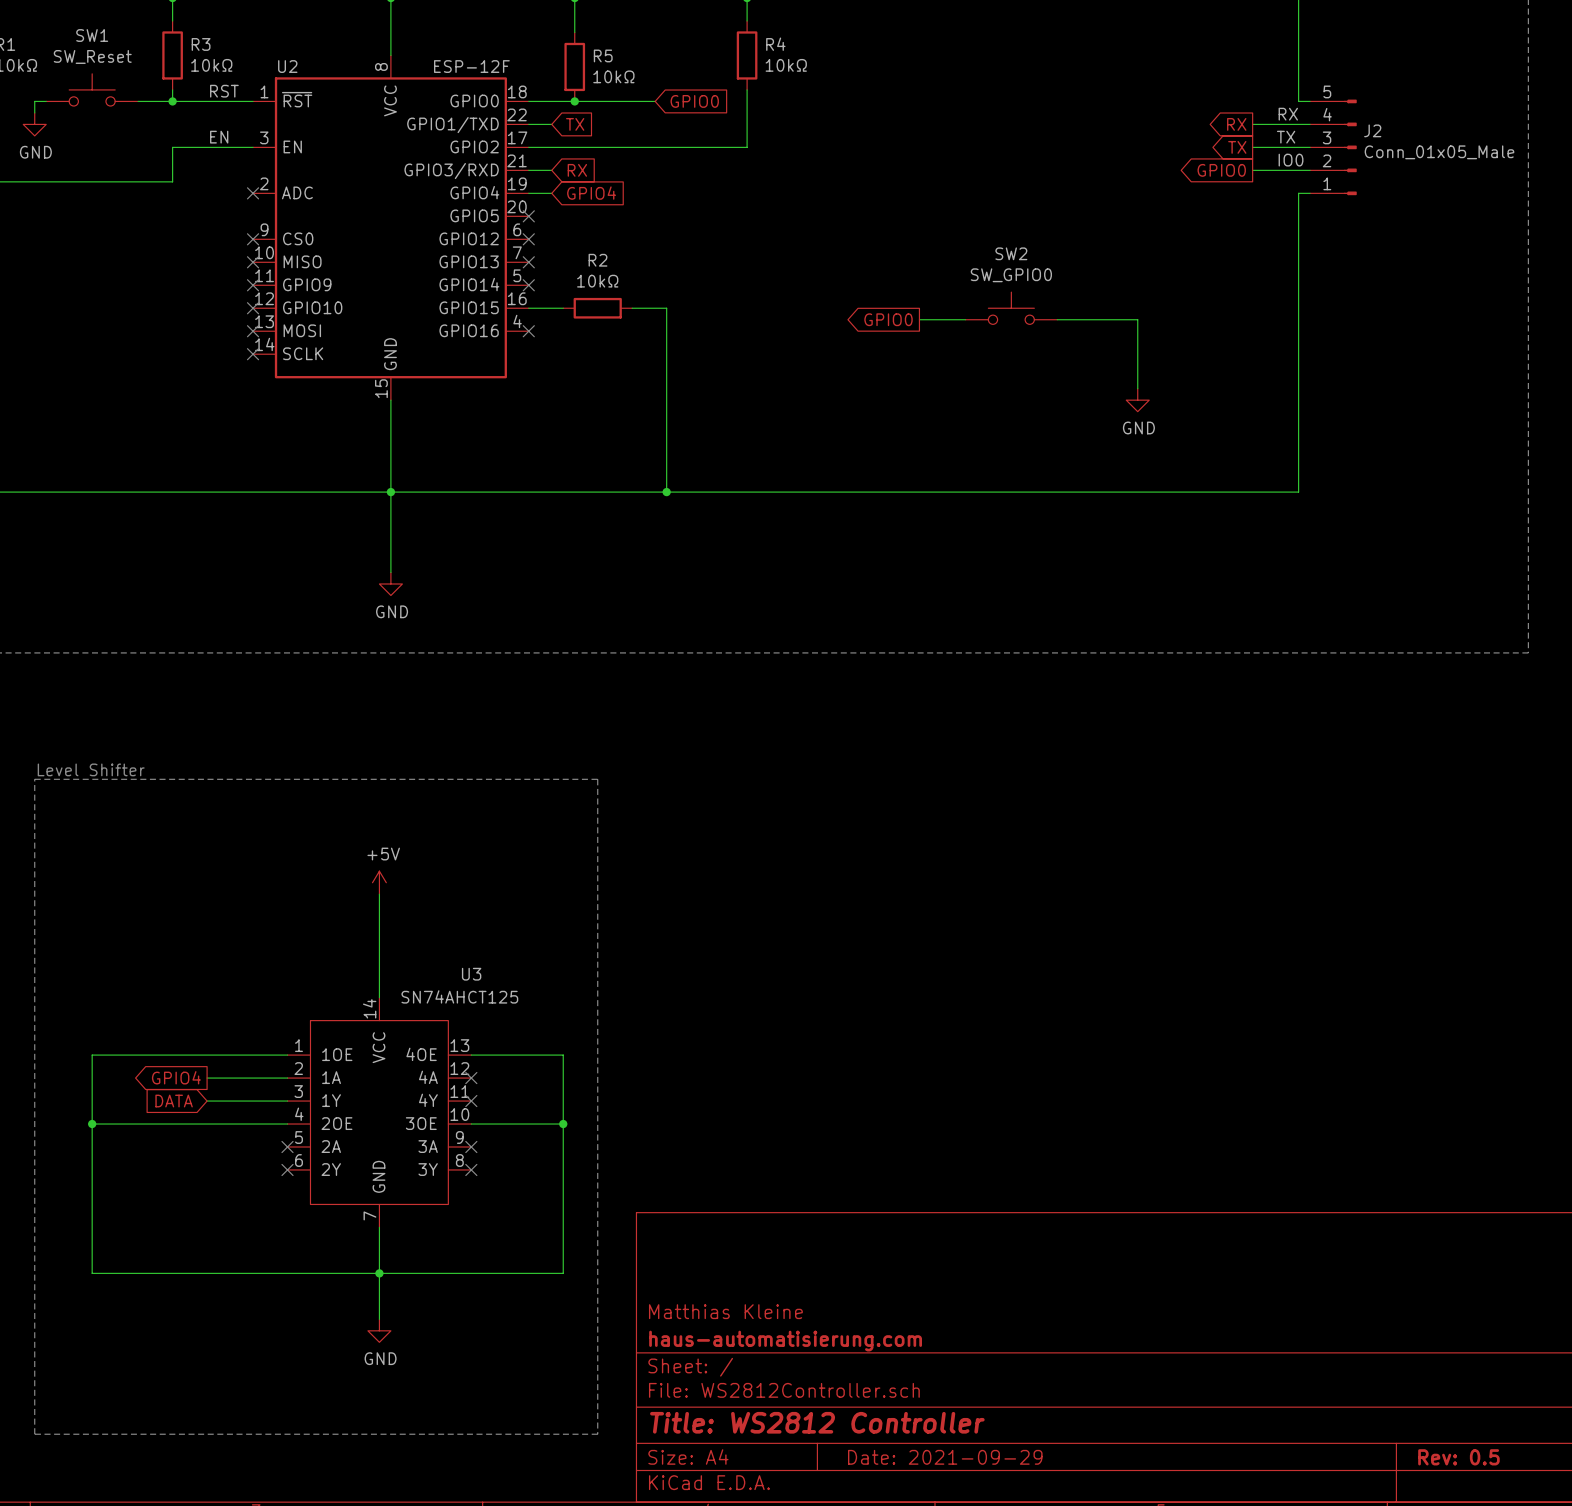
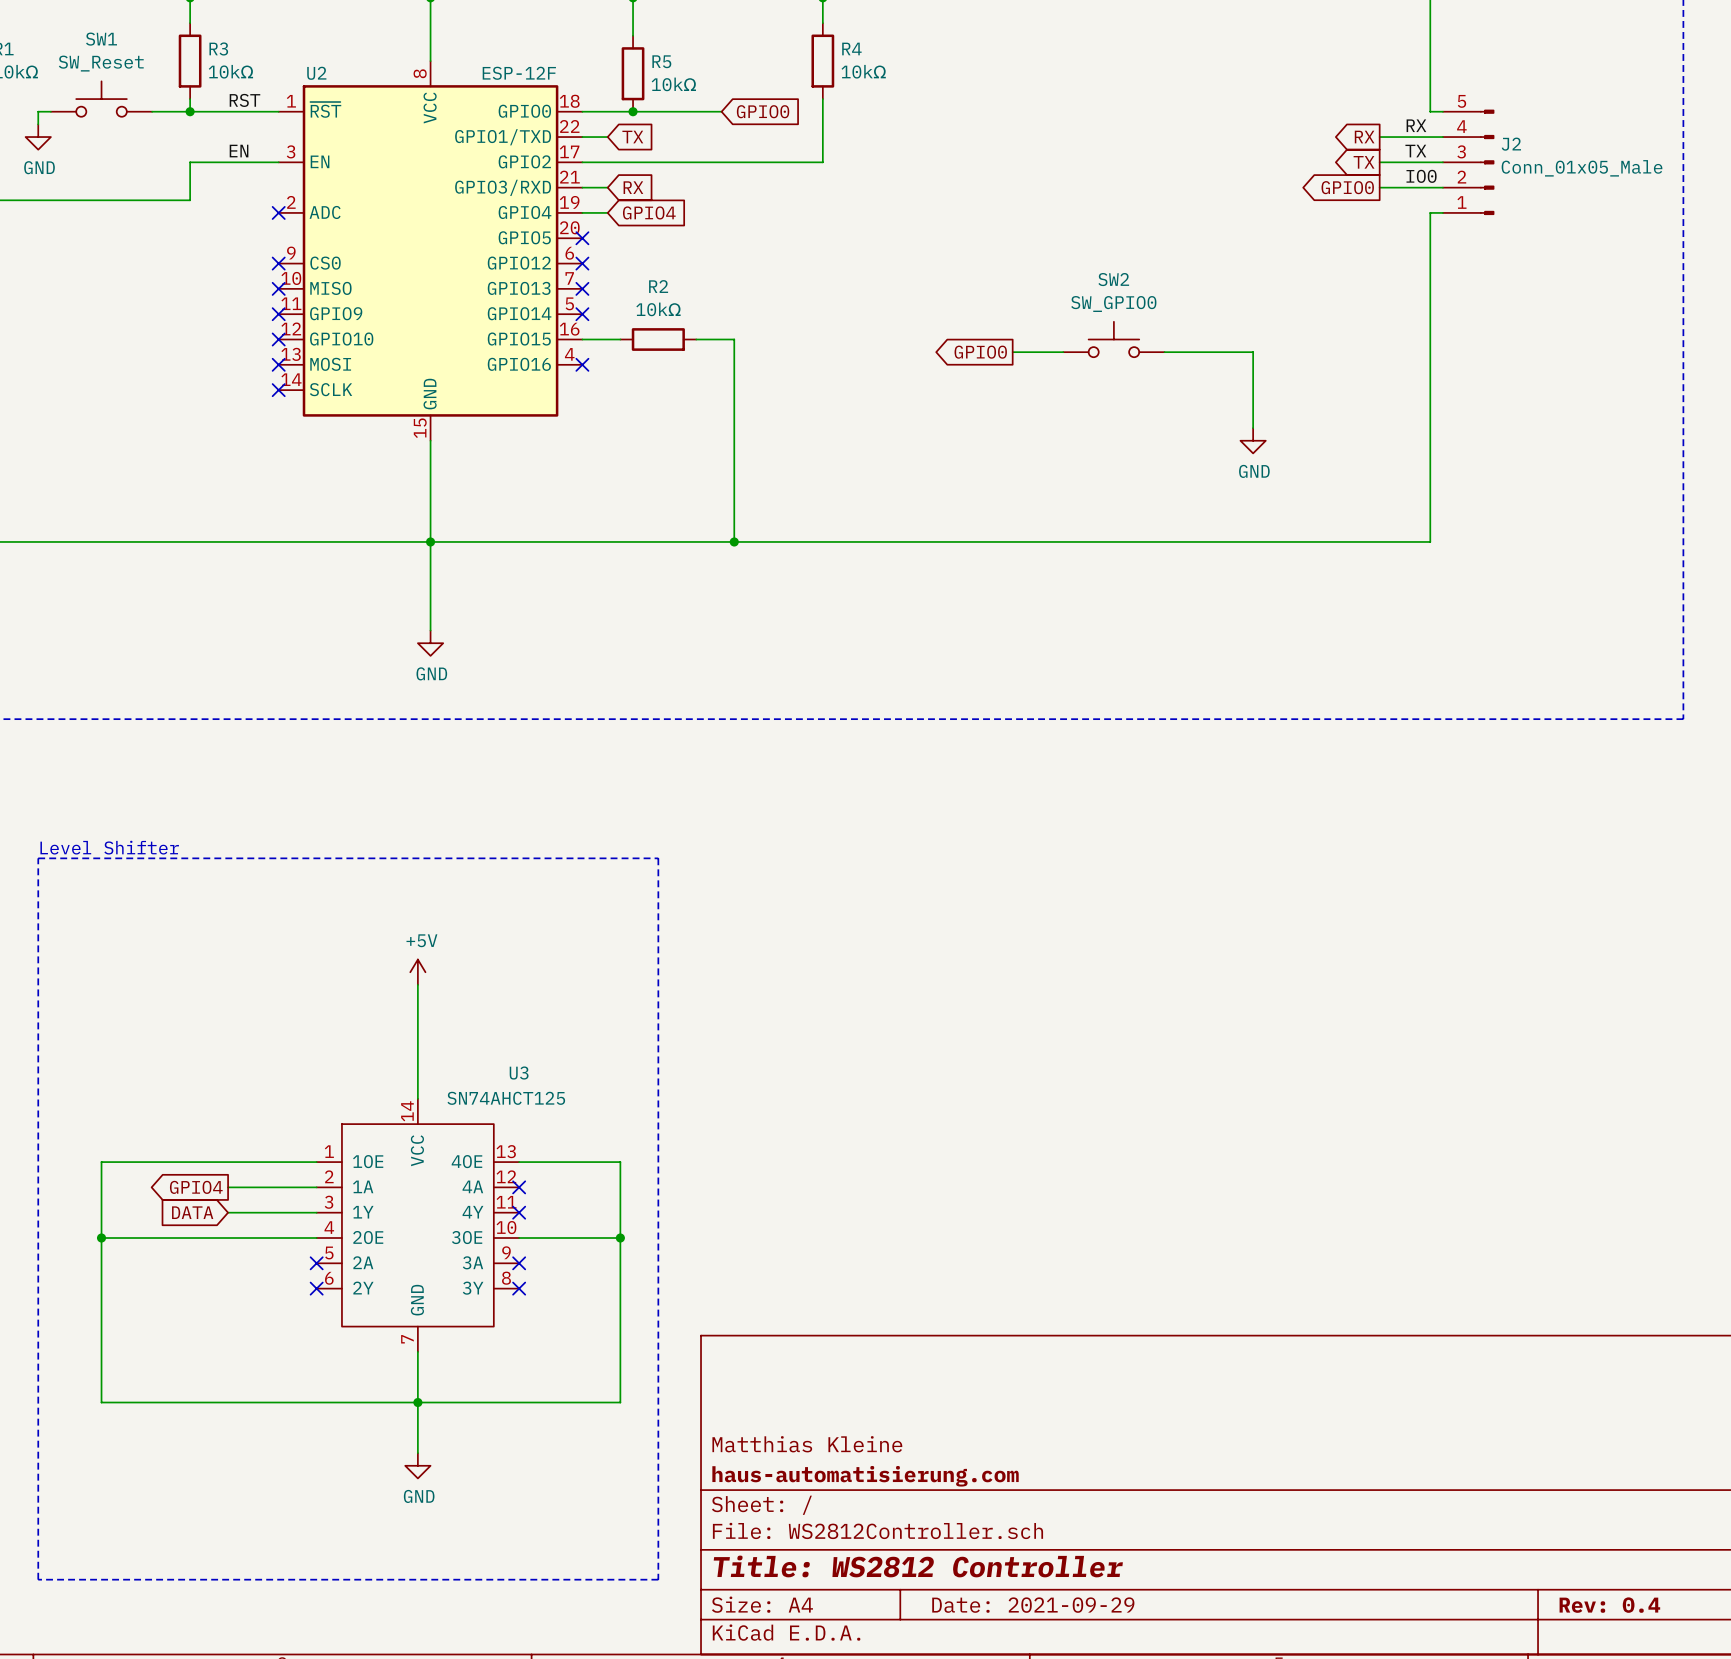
title block: Rev: 0.5 (1458, 1457) -> Rev: 0.4 (1609, 1605)

